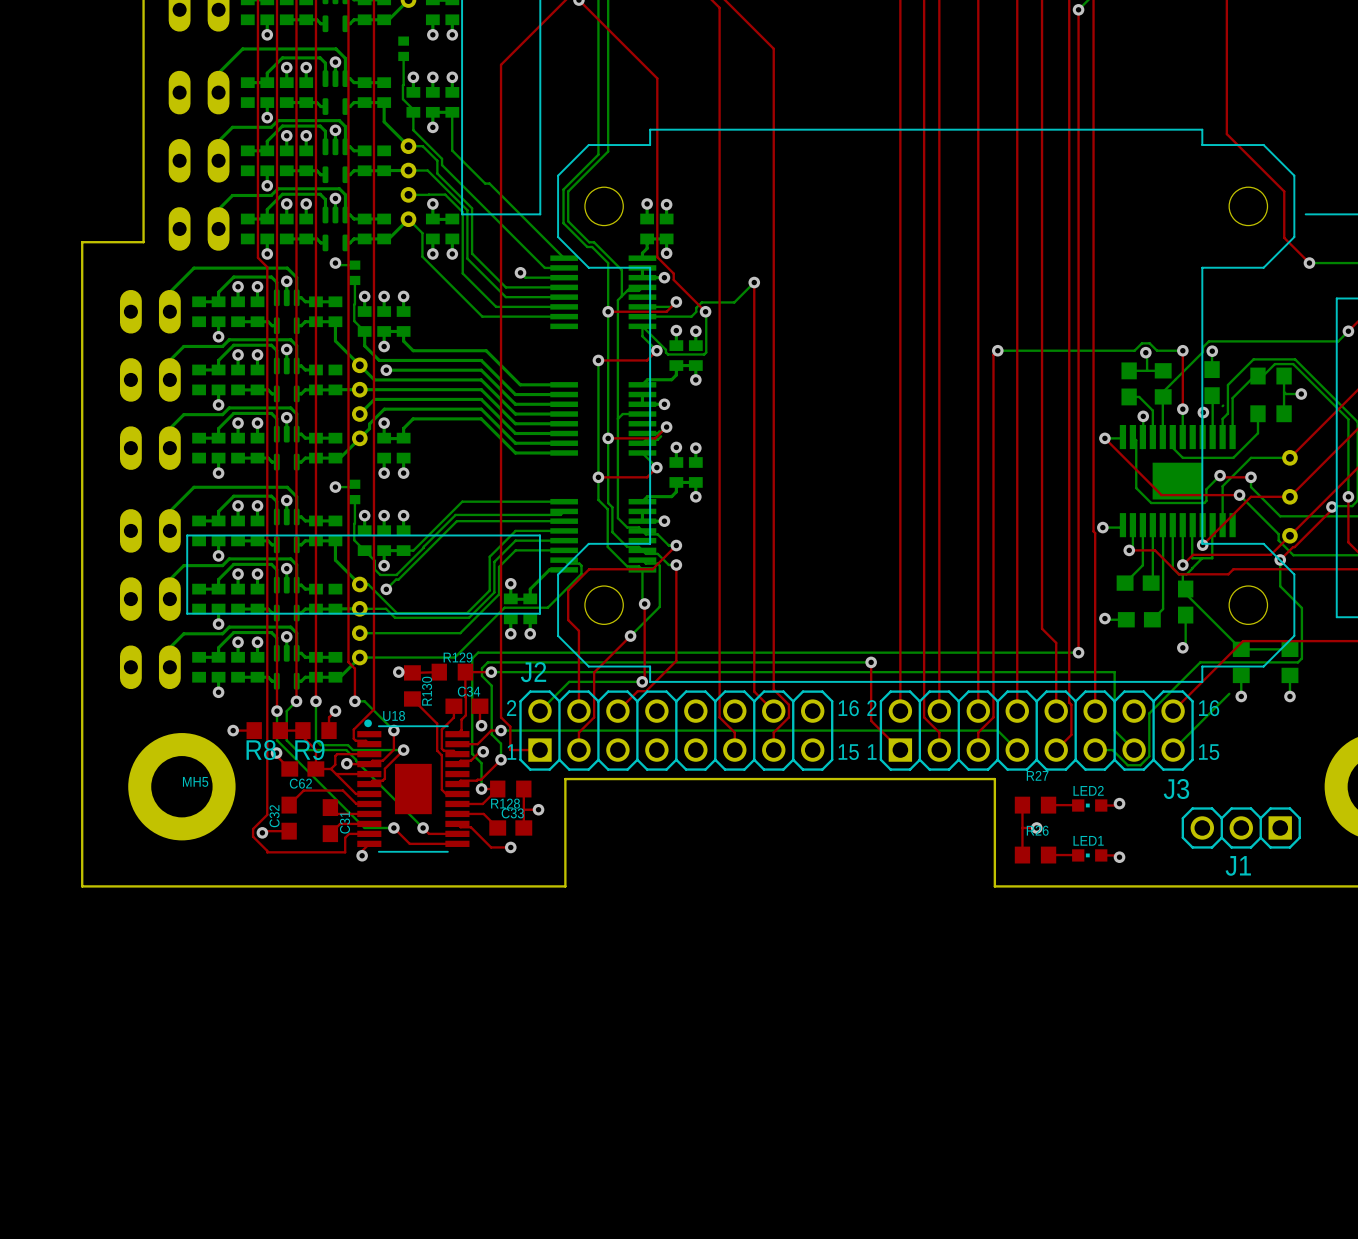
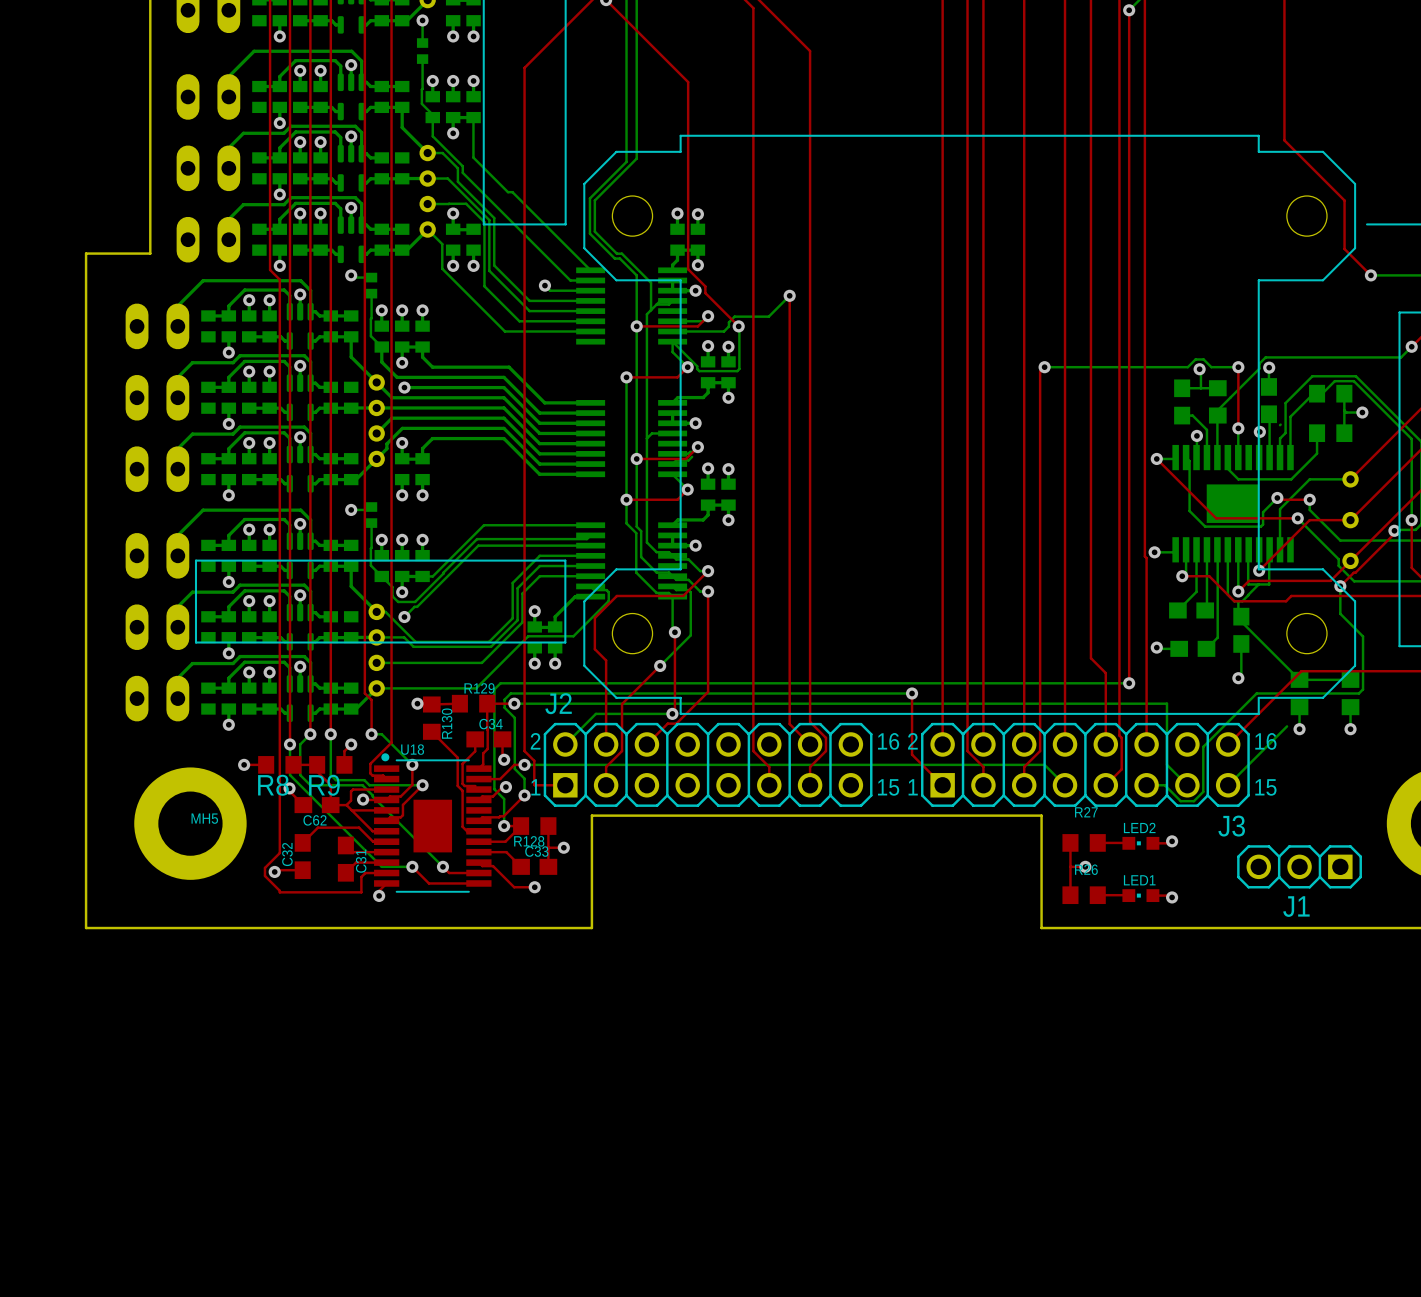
bottom track: none -> (422, 20) (422, 43)
via: none -> (422, 20)

